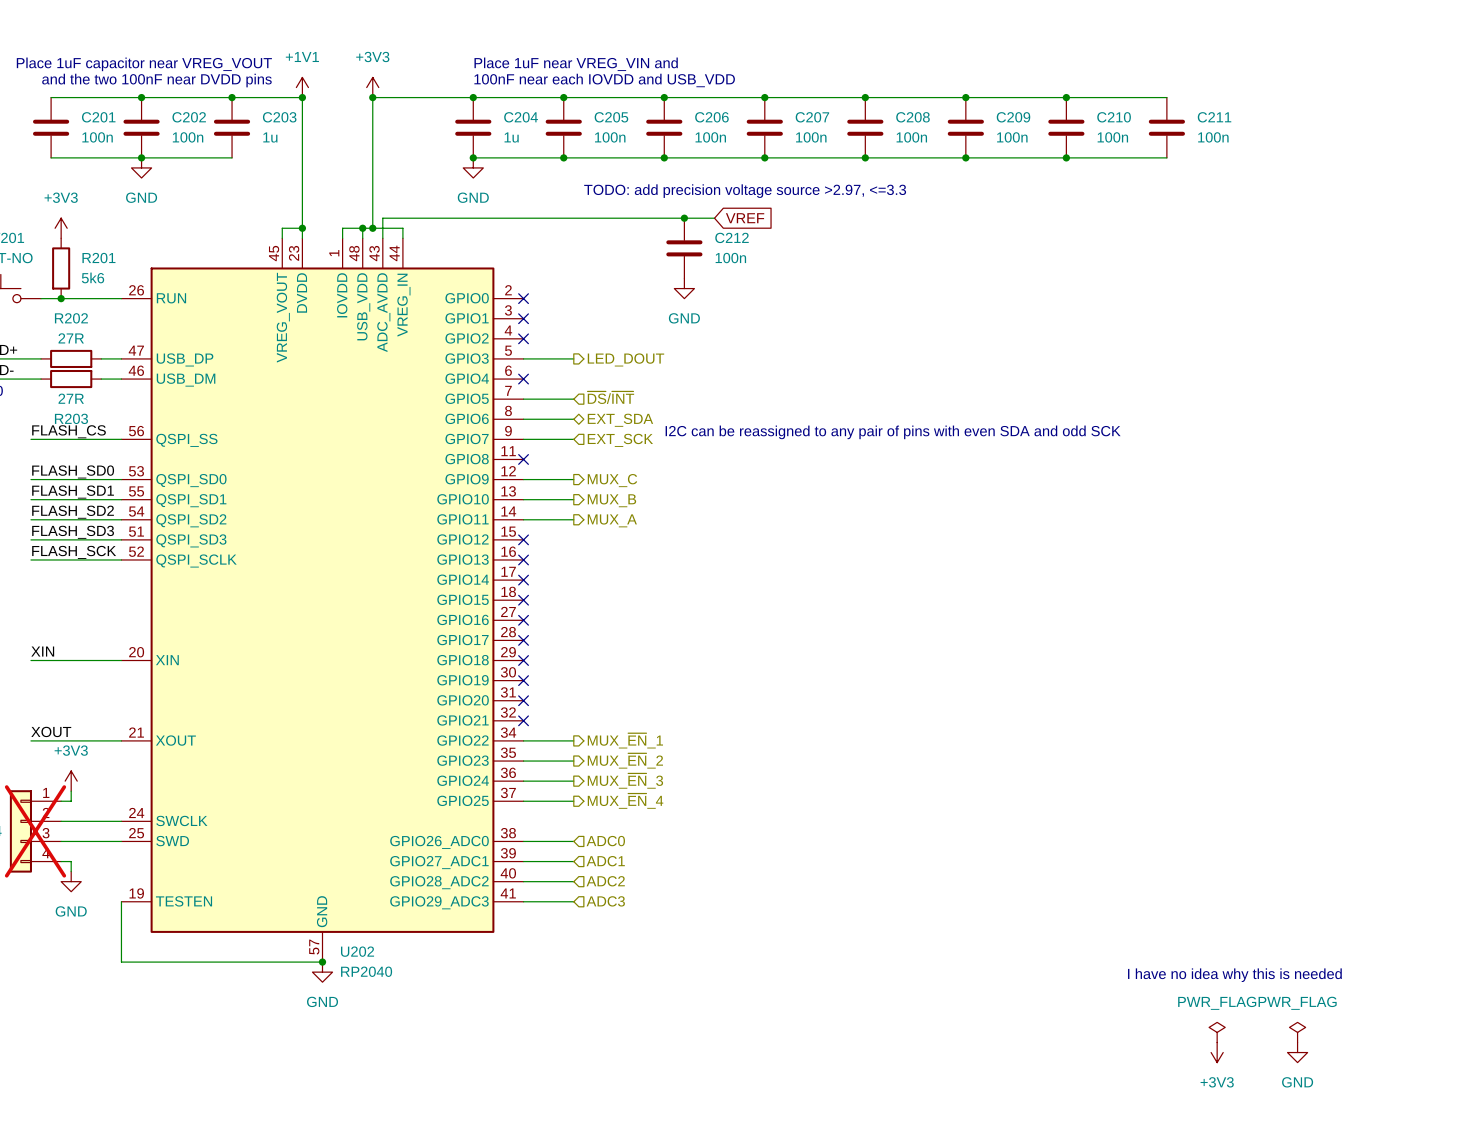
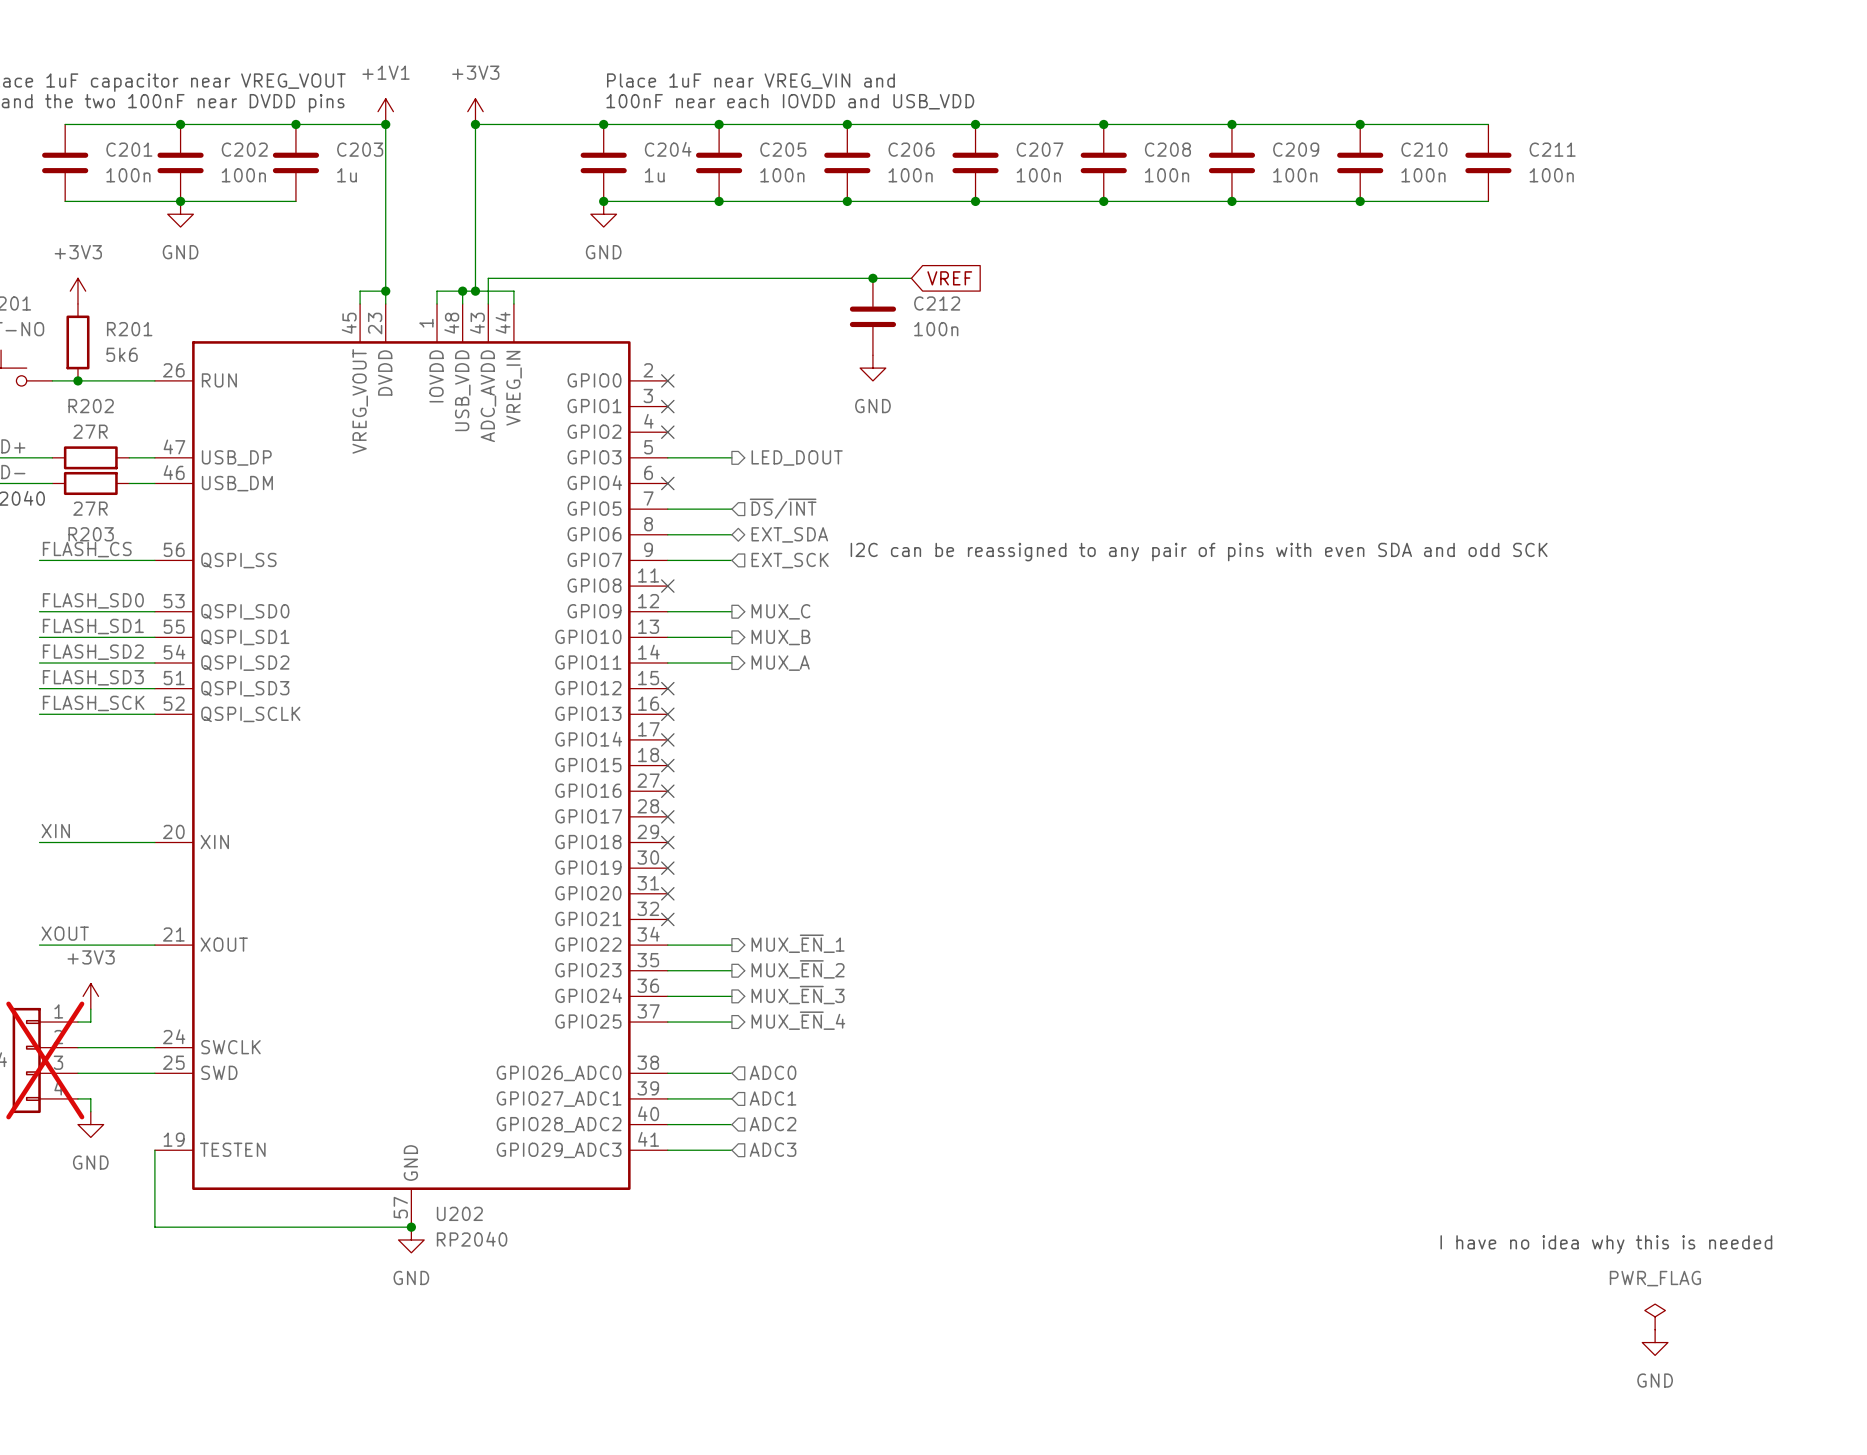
text: TODO: add precision voltage source >2.97, <=3.3 (745, 191) -> none
power symbol: PWR_FLAG (1217, 1032) -> none
power symbol: +3V3 (1217, 1052) -> none

